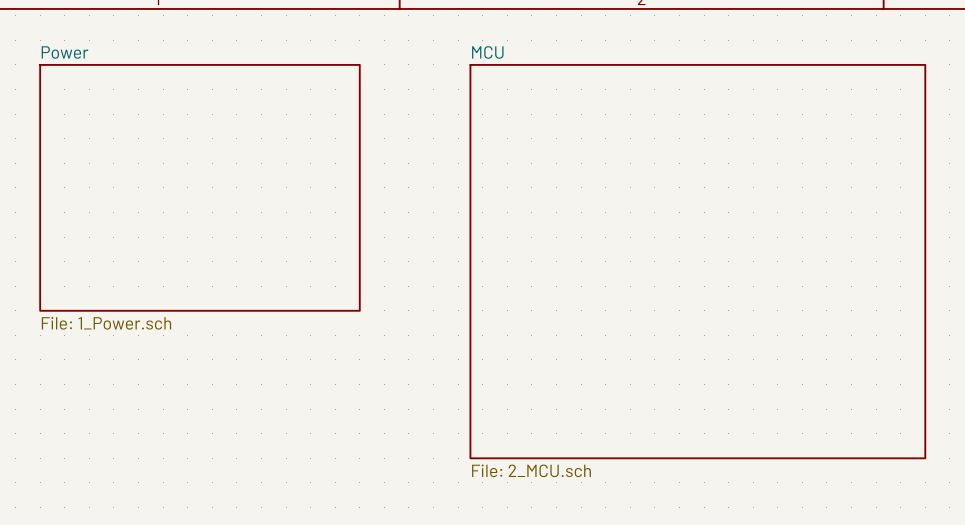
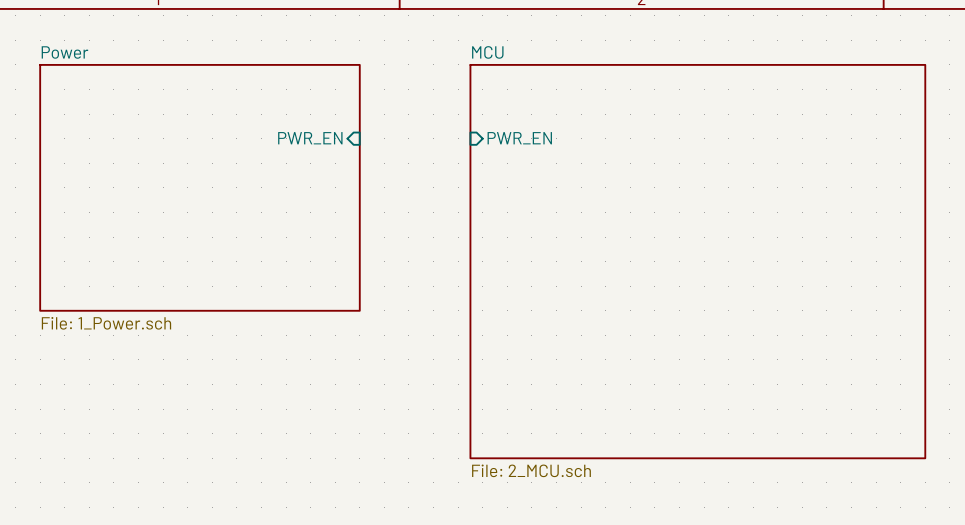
sheet pin: none -> PWR_EN (310, 138)
sheet pin: none -> PWR_EN (519, 138)

